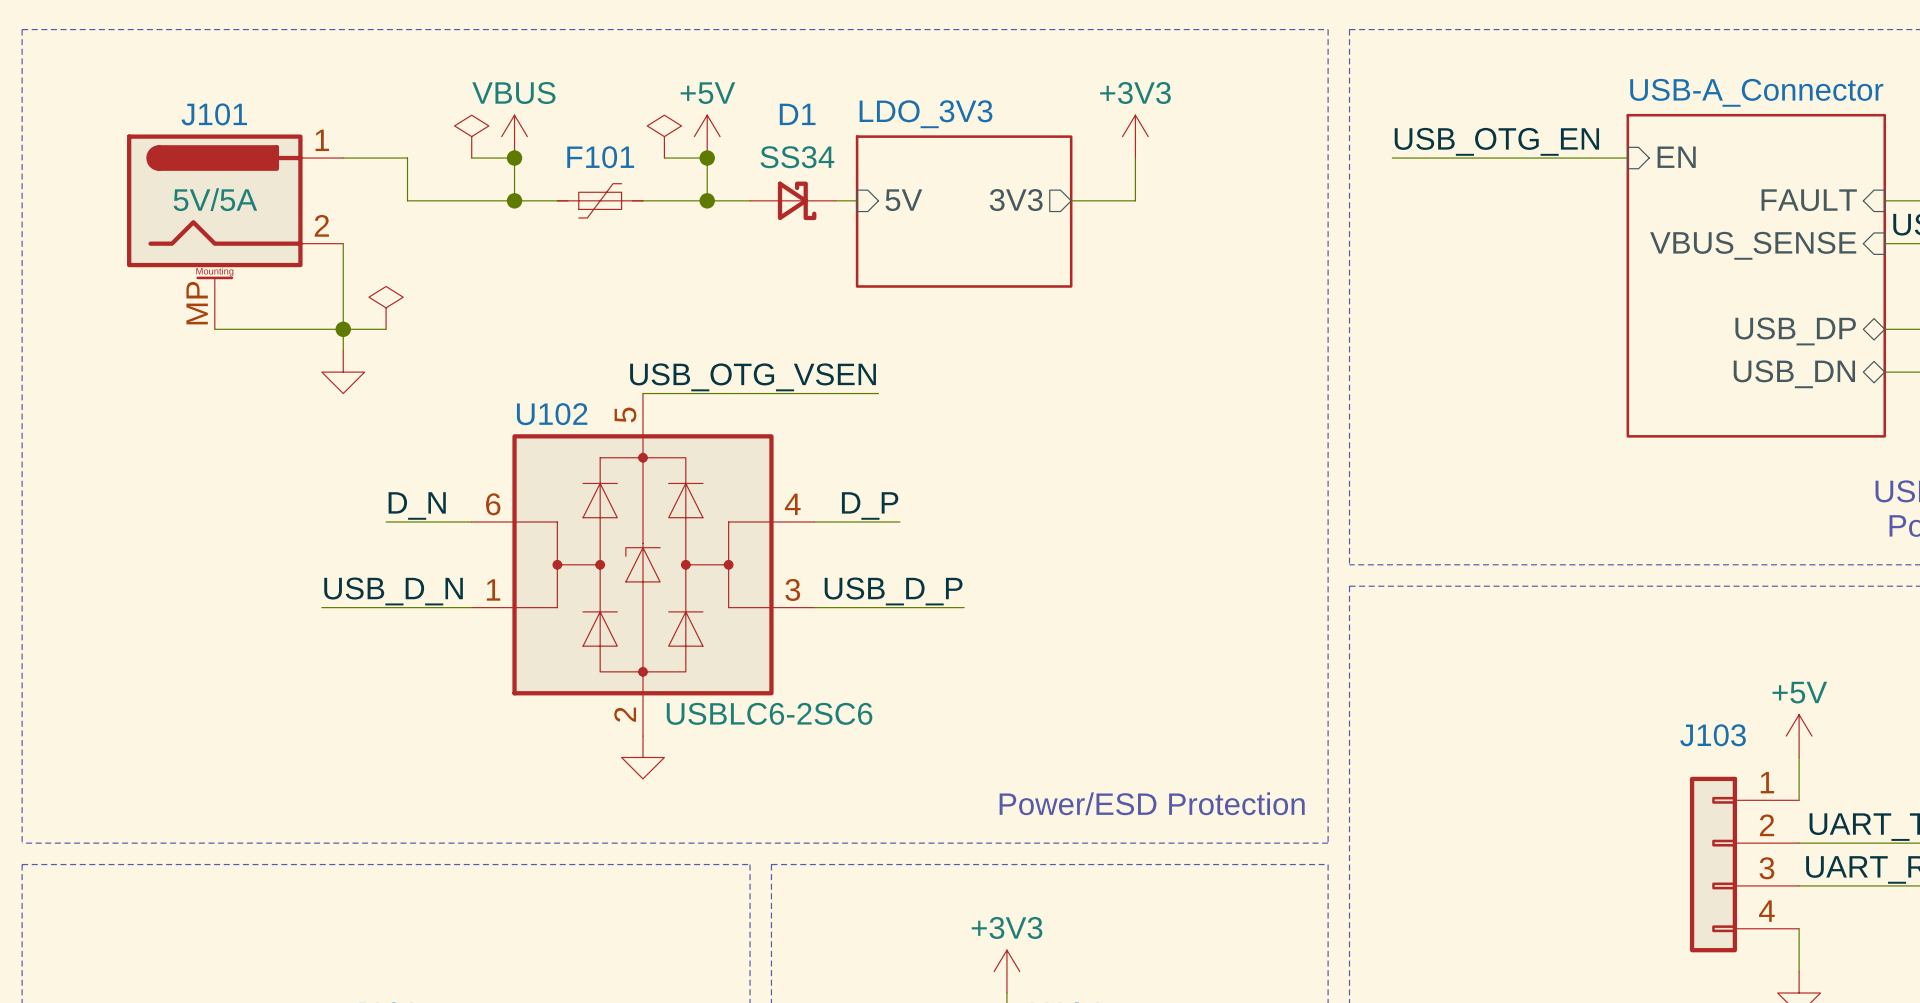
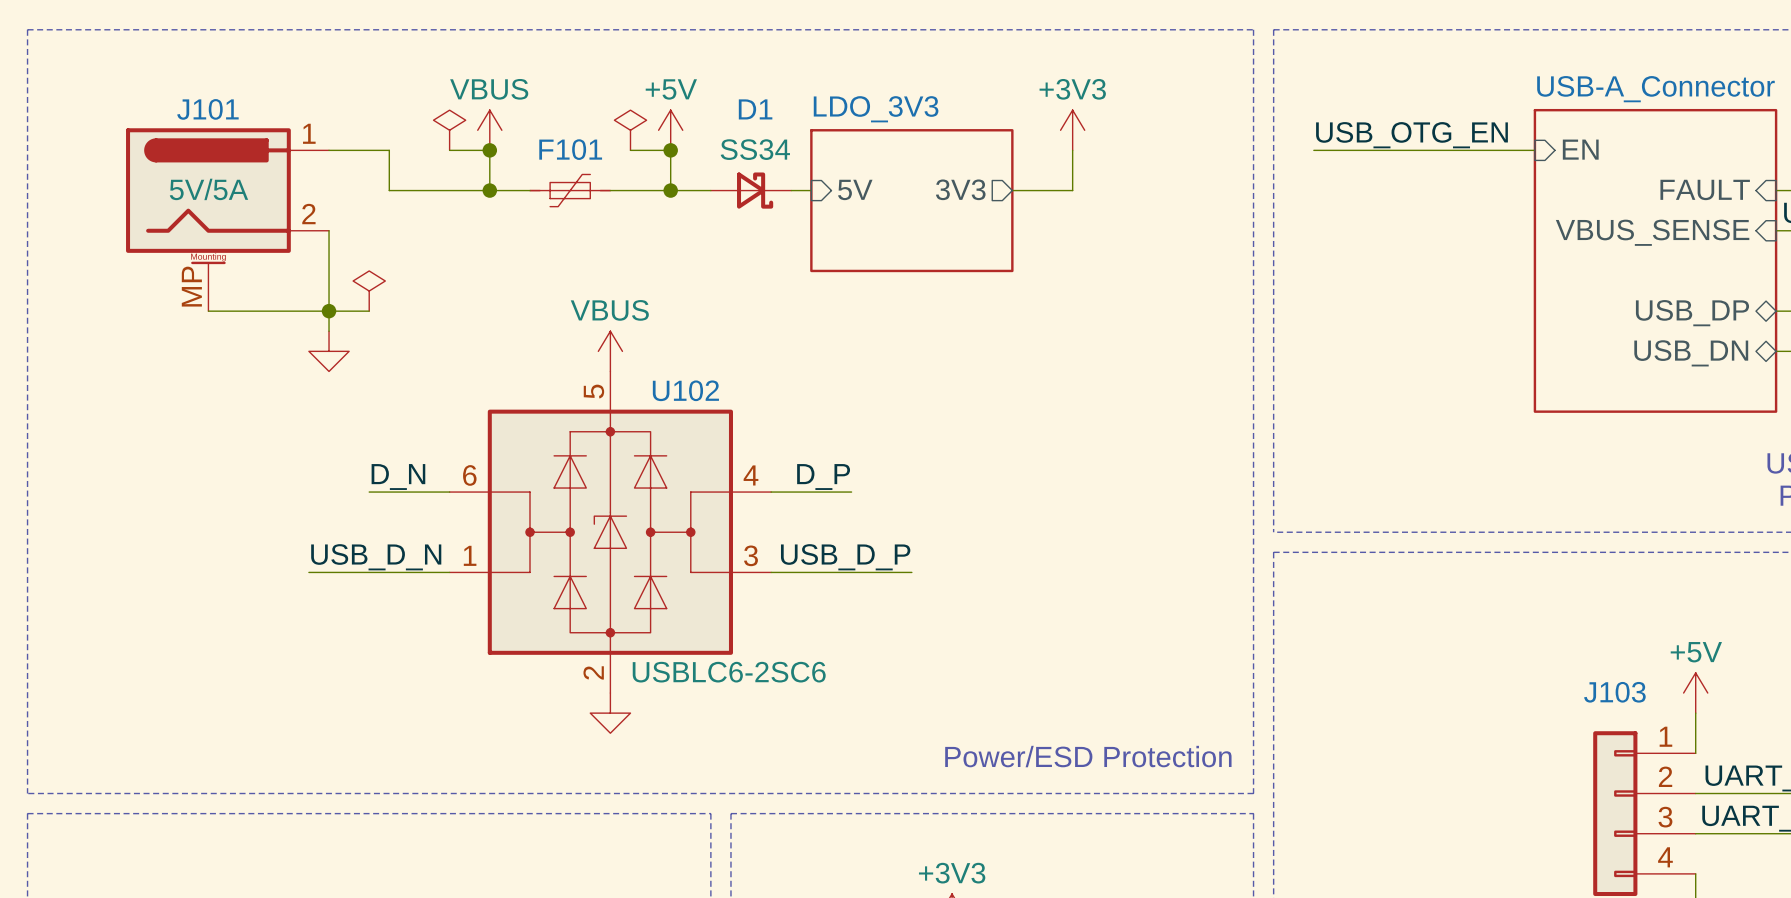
power symbol: none -> VBUS (610, 351)
label: USB_OTG_VSEN (753, 377) -> none
wire: (642, 393) (878, 393) -> none
U102 name position: U102 (552, 414) -> U102 (685, 390)

